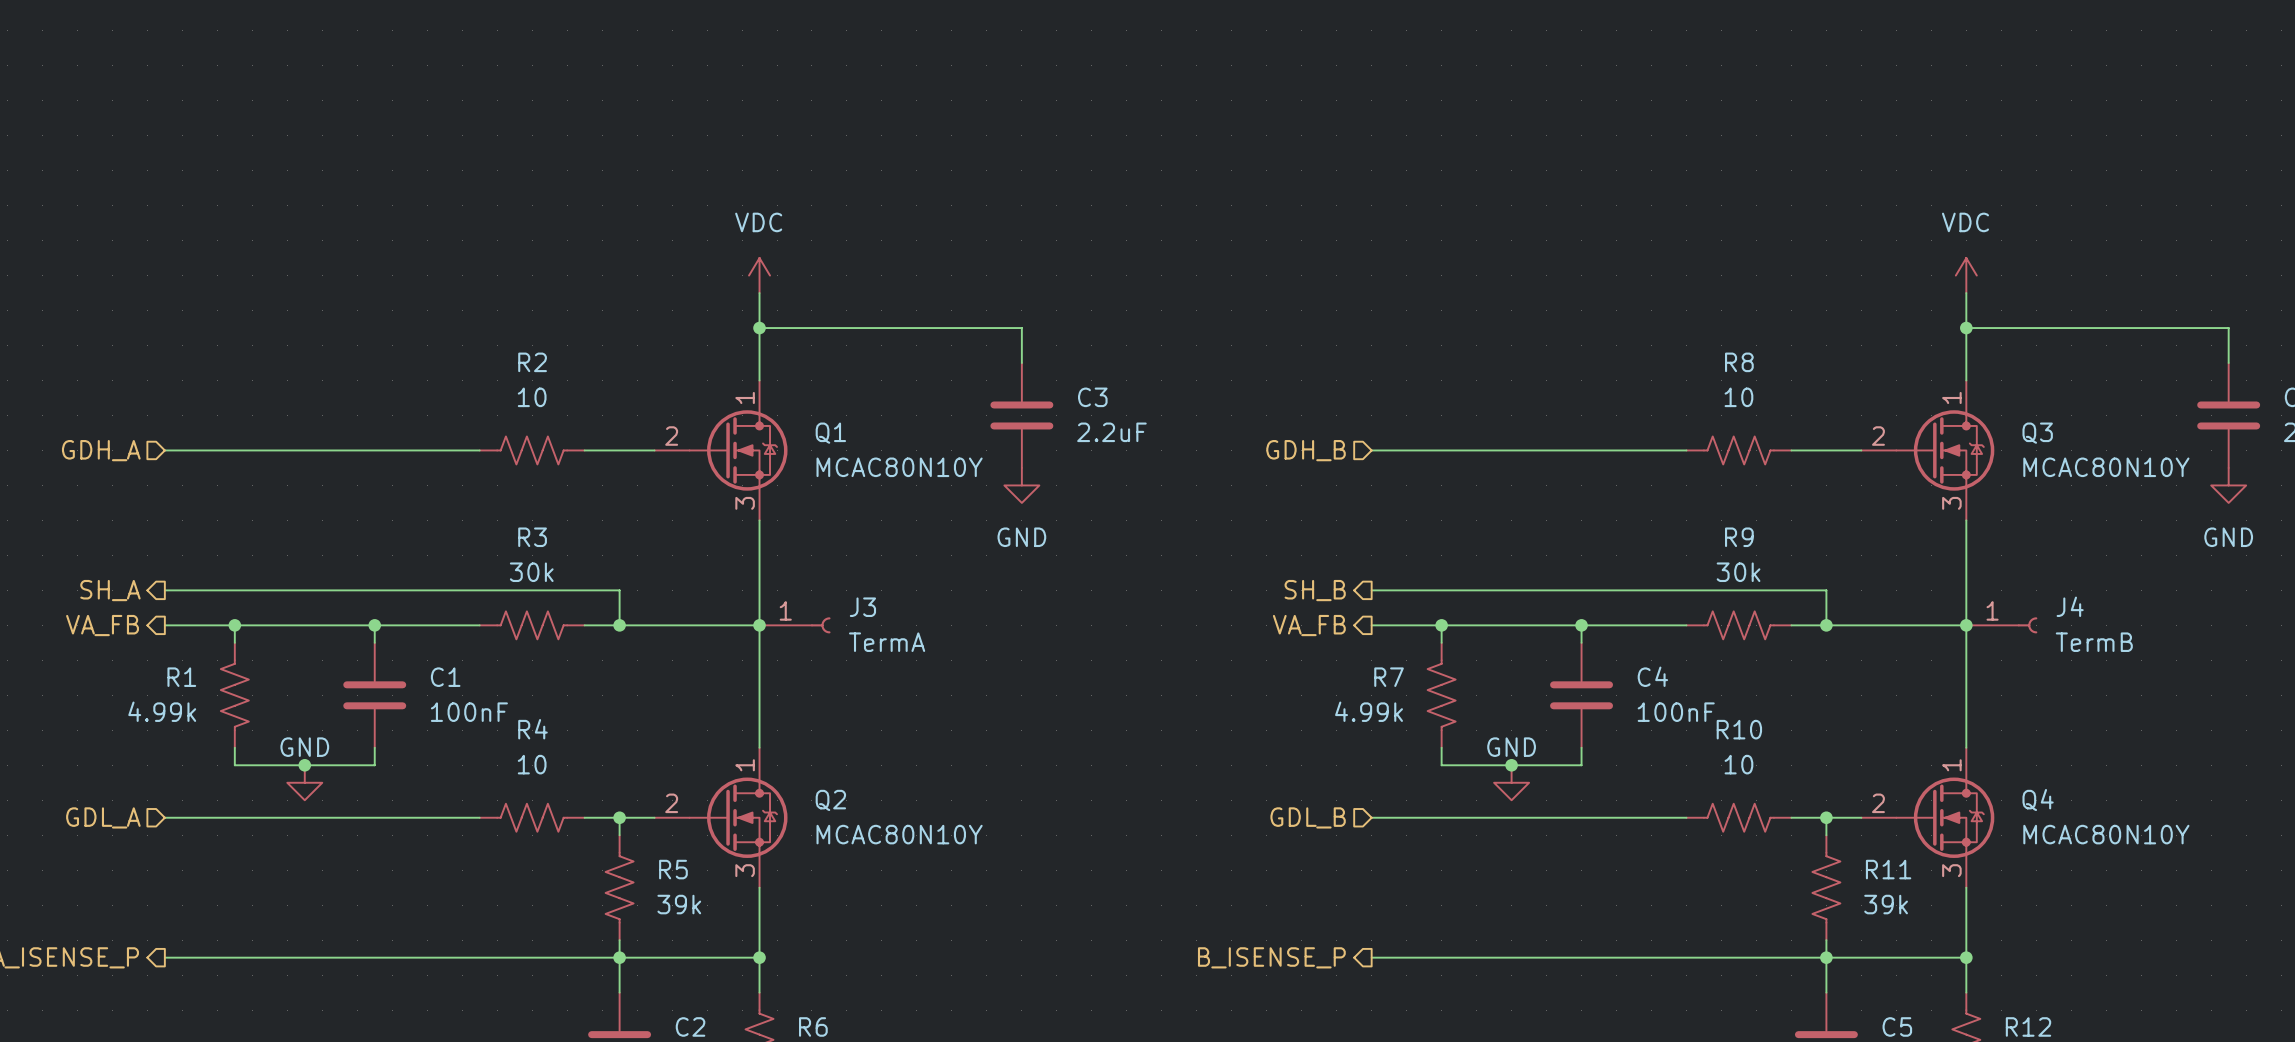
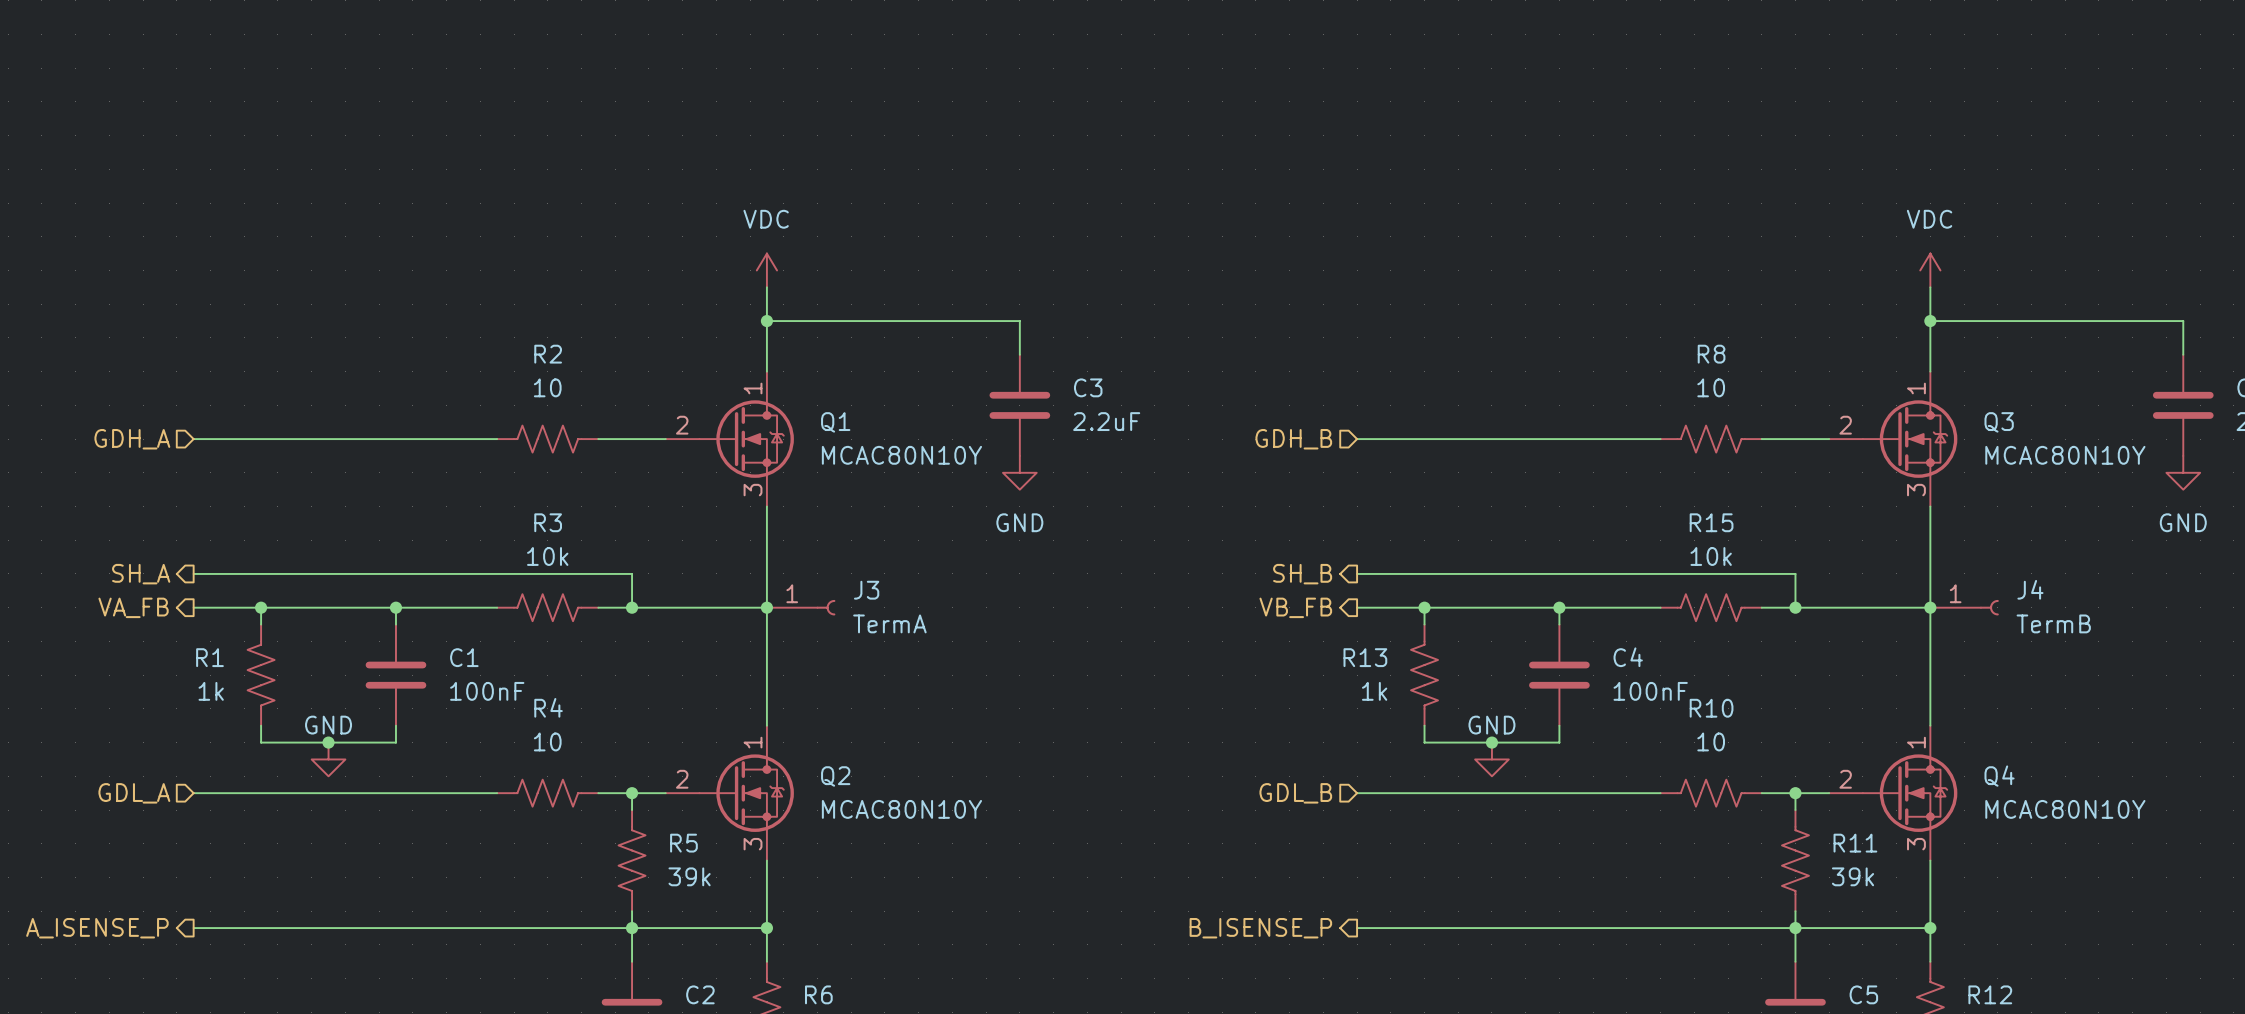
R9 name: R9 (1739, 537) -> R15 (1711, 522)
R3 value: 30k (531, 572) -> 10k (547, 556)
R9 value: 30k (1738, 572) -> 10k (1711, 556)
hierarchical label: VA_FB (1309, 625) -> VB_FB (1295, 607)
R7 name: R7 (1389, 677) -> R13 (1365, 657)
R1 value: 4.99k (162, 711) -> 1k (211, 691)
R7 value: 4.99k (1369, 711) -> 1k (1374, 691)

